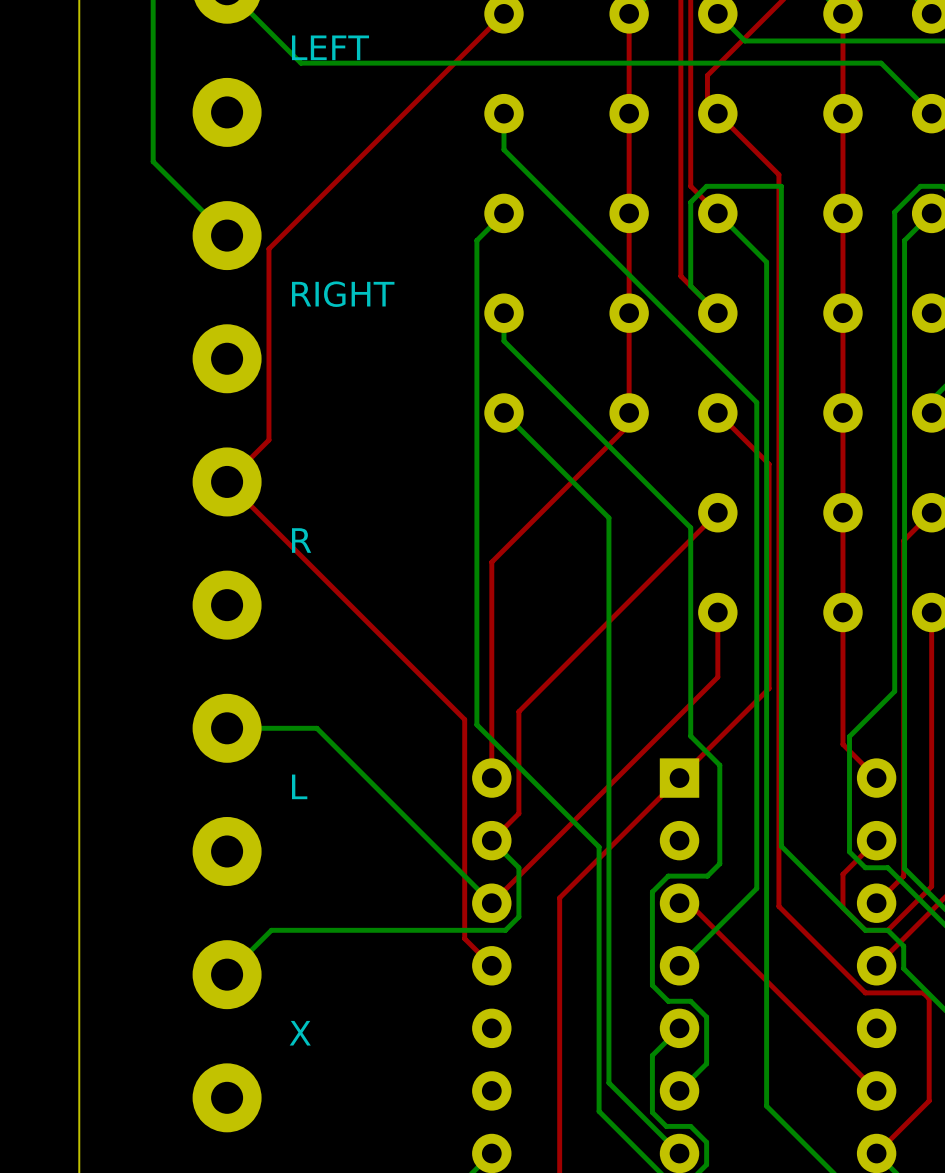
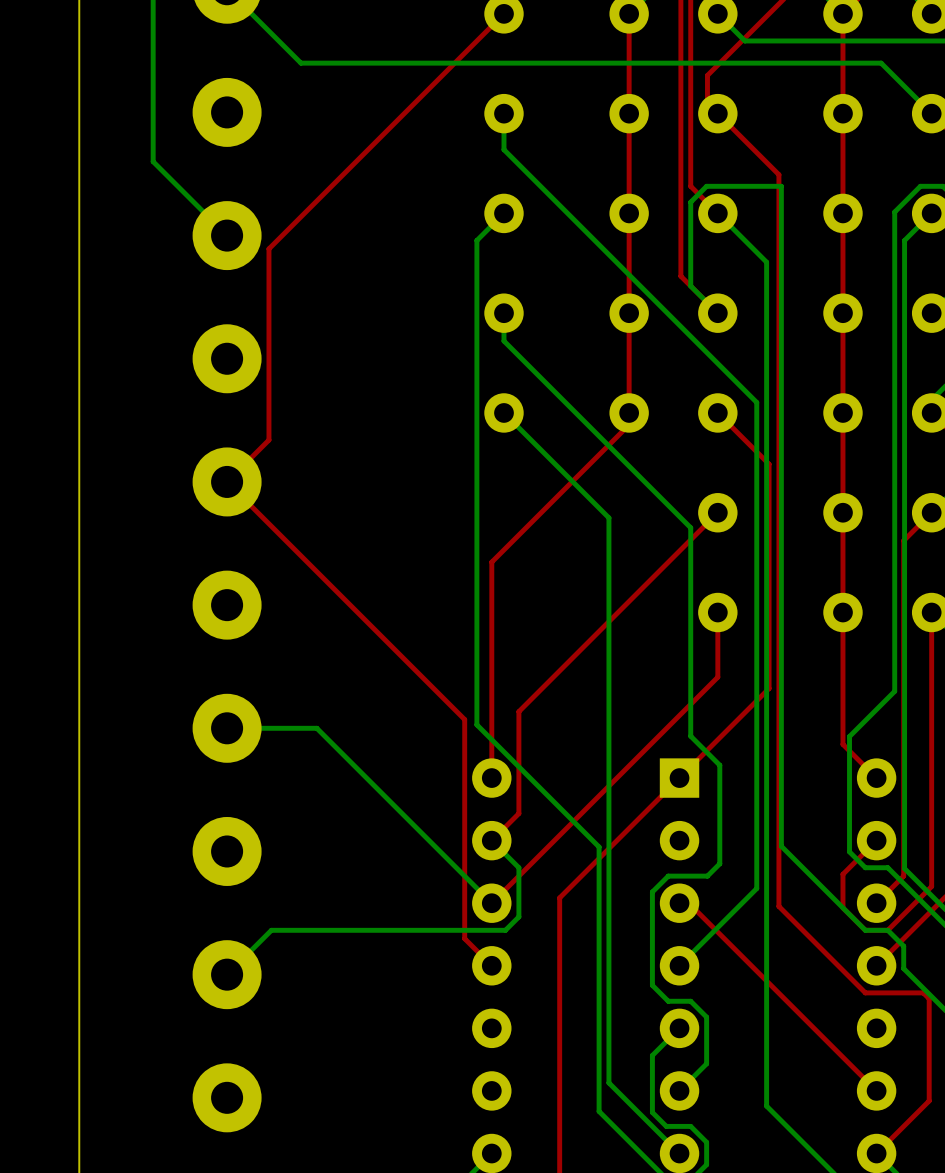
text: LEFT (330, 47) -> none
text: RIGHT (343, 294) -> none
text: R (301, 540) -> none
text: L (299, 786) -> none
text: X (300, 1033) -> none

